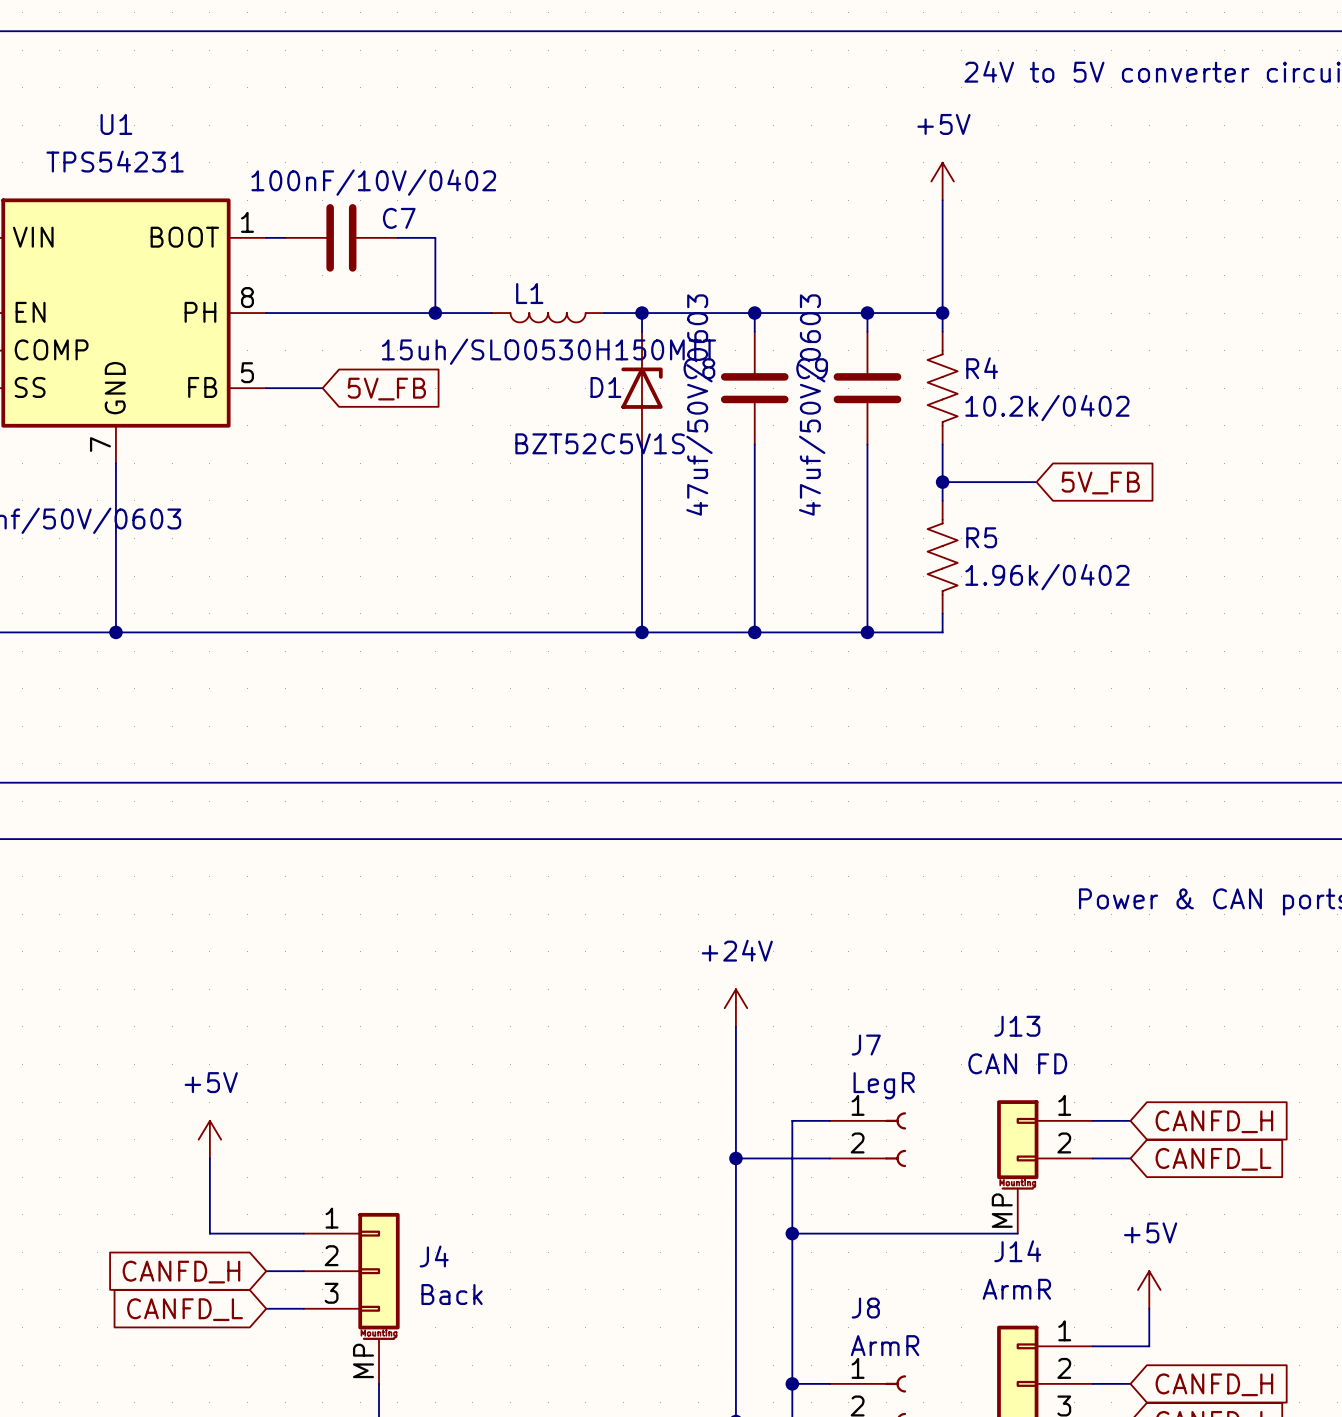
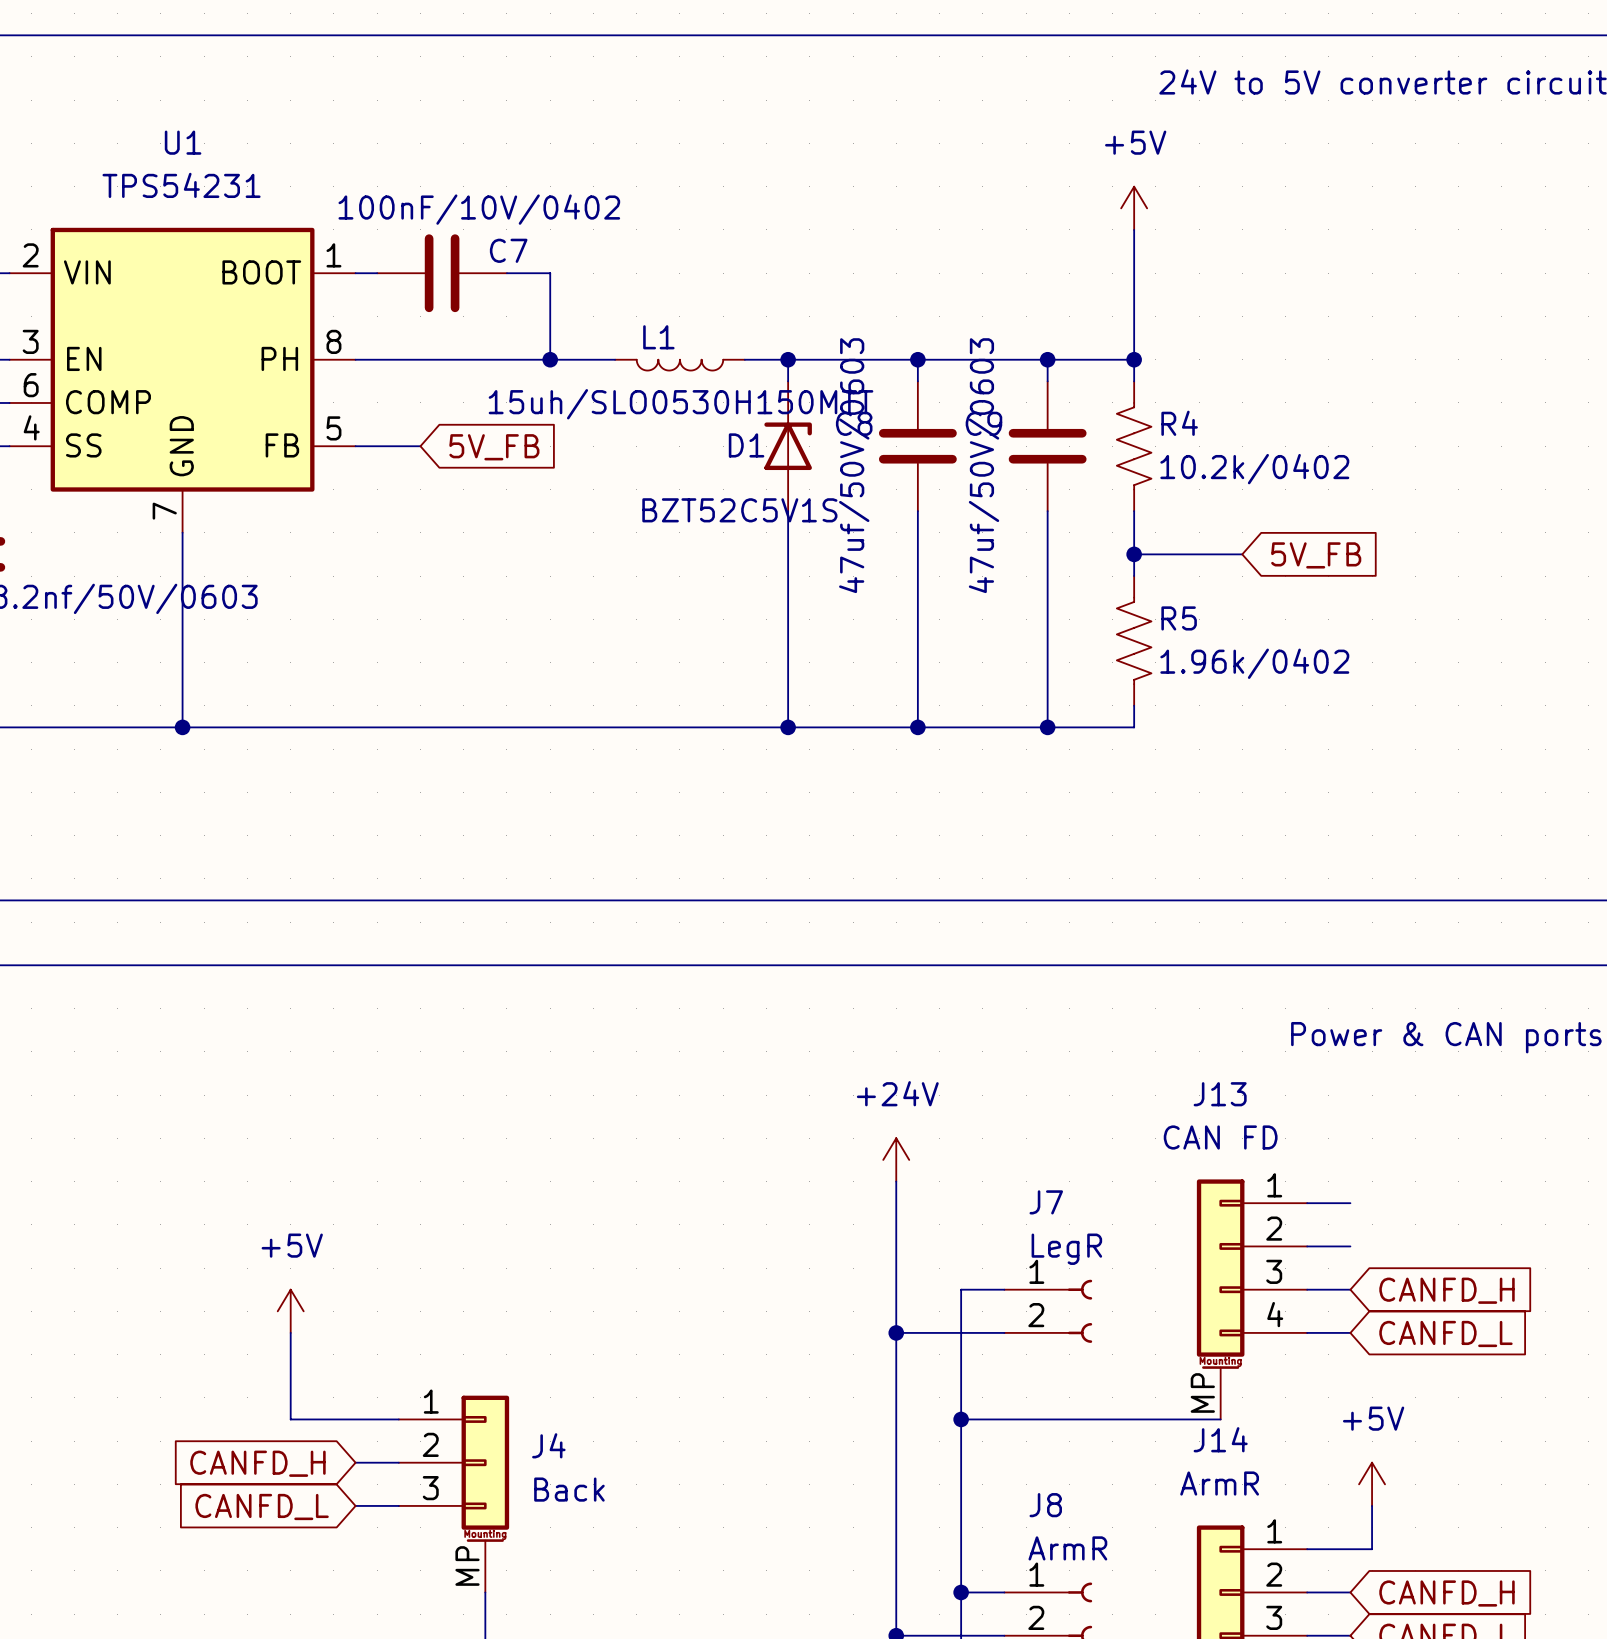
J13 name position: J13 (1017, 1026) -> J13 (1220, 1094)
wire: none -> (1307, 1203) (1350, 1203)
J13 value position: CAN FD (1017, 1063) -> CAN FD (1220, 1137)
wire: none -> (1307, 1246) (1350, 1246)
J13 symbol: [997, 1100, 1093, 1234] -> [1196, 1179, 1308, 1420]

